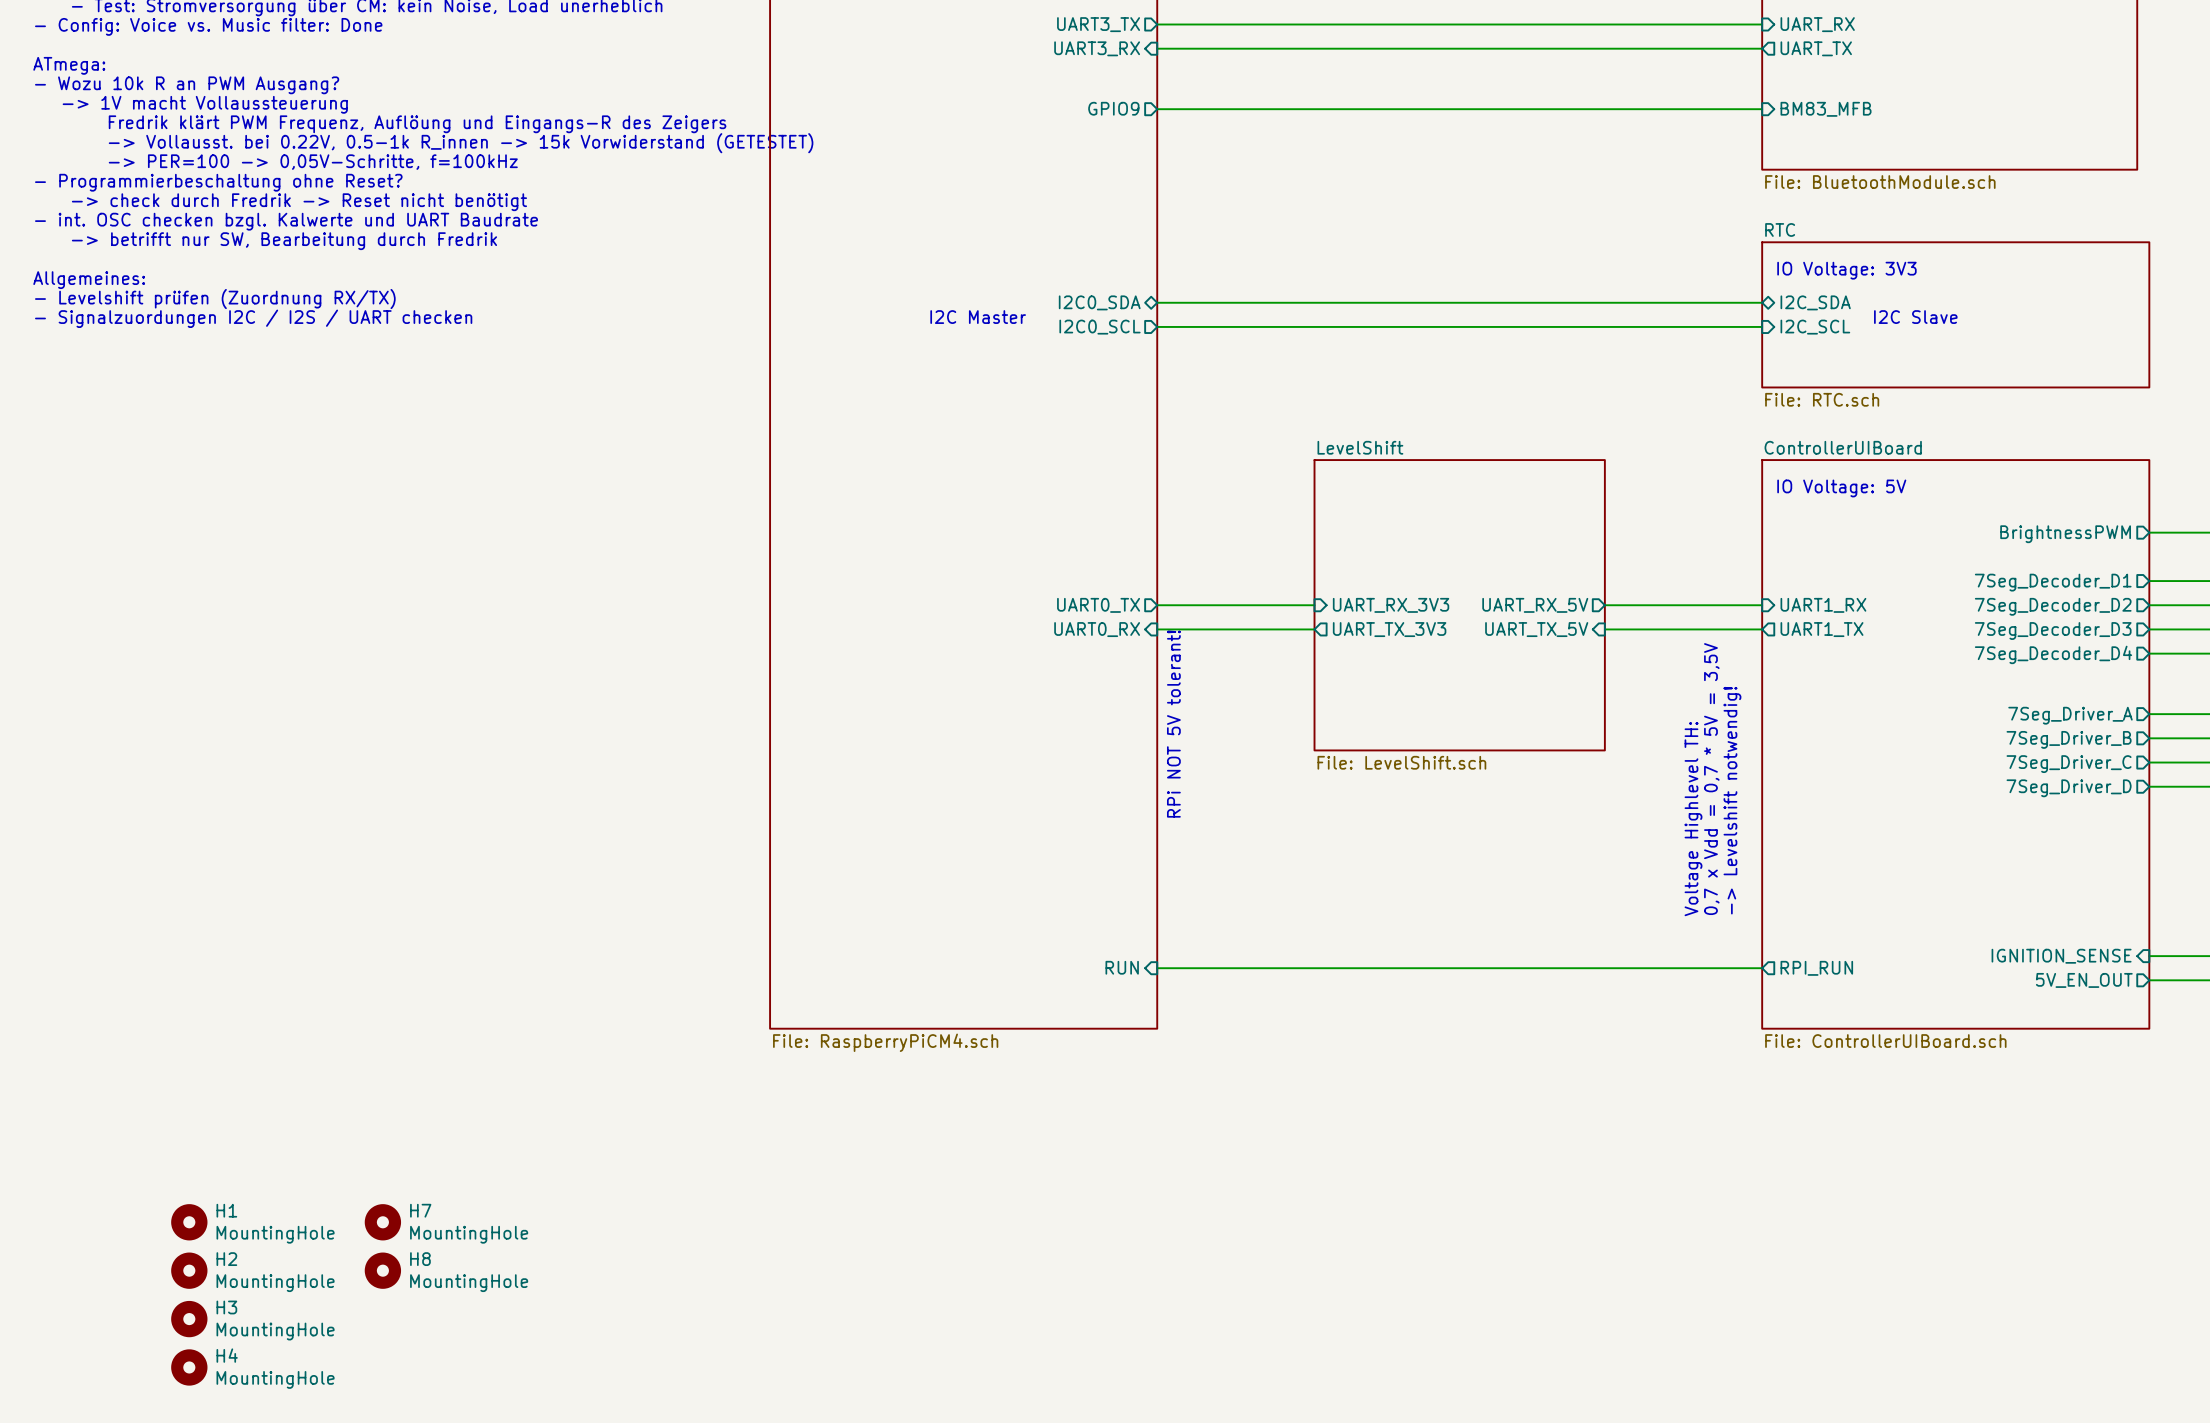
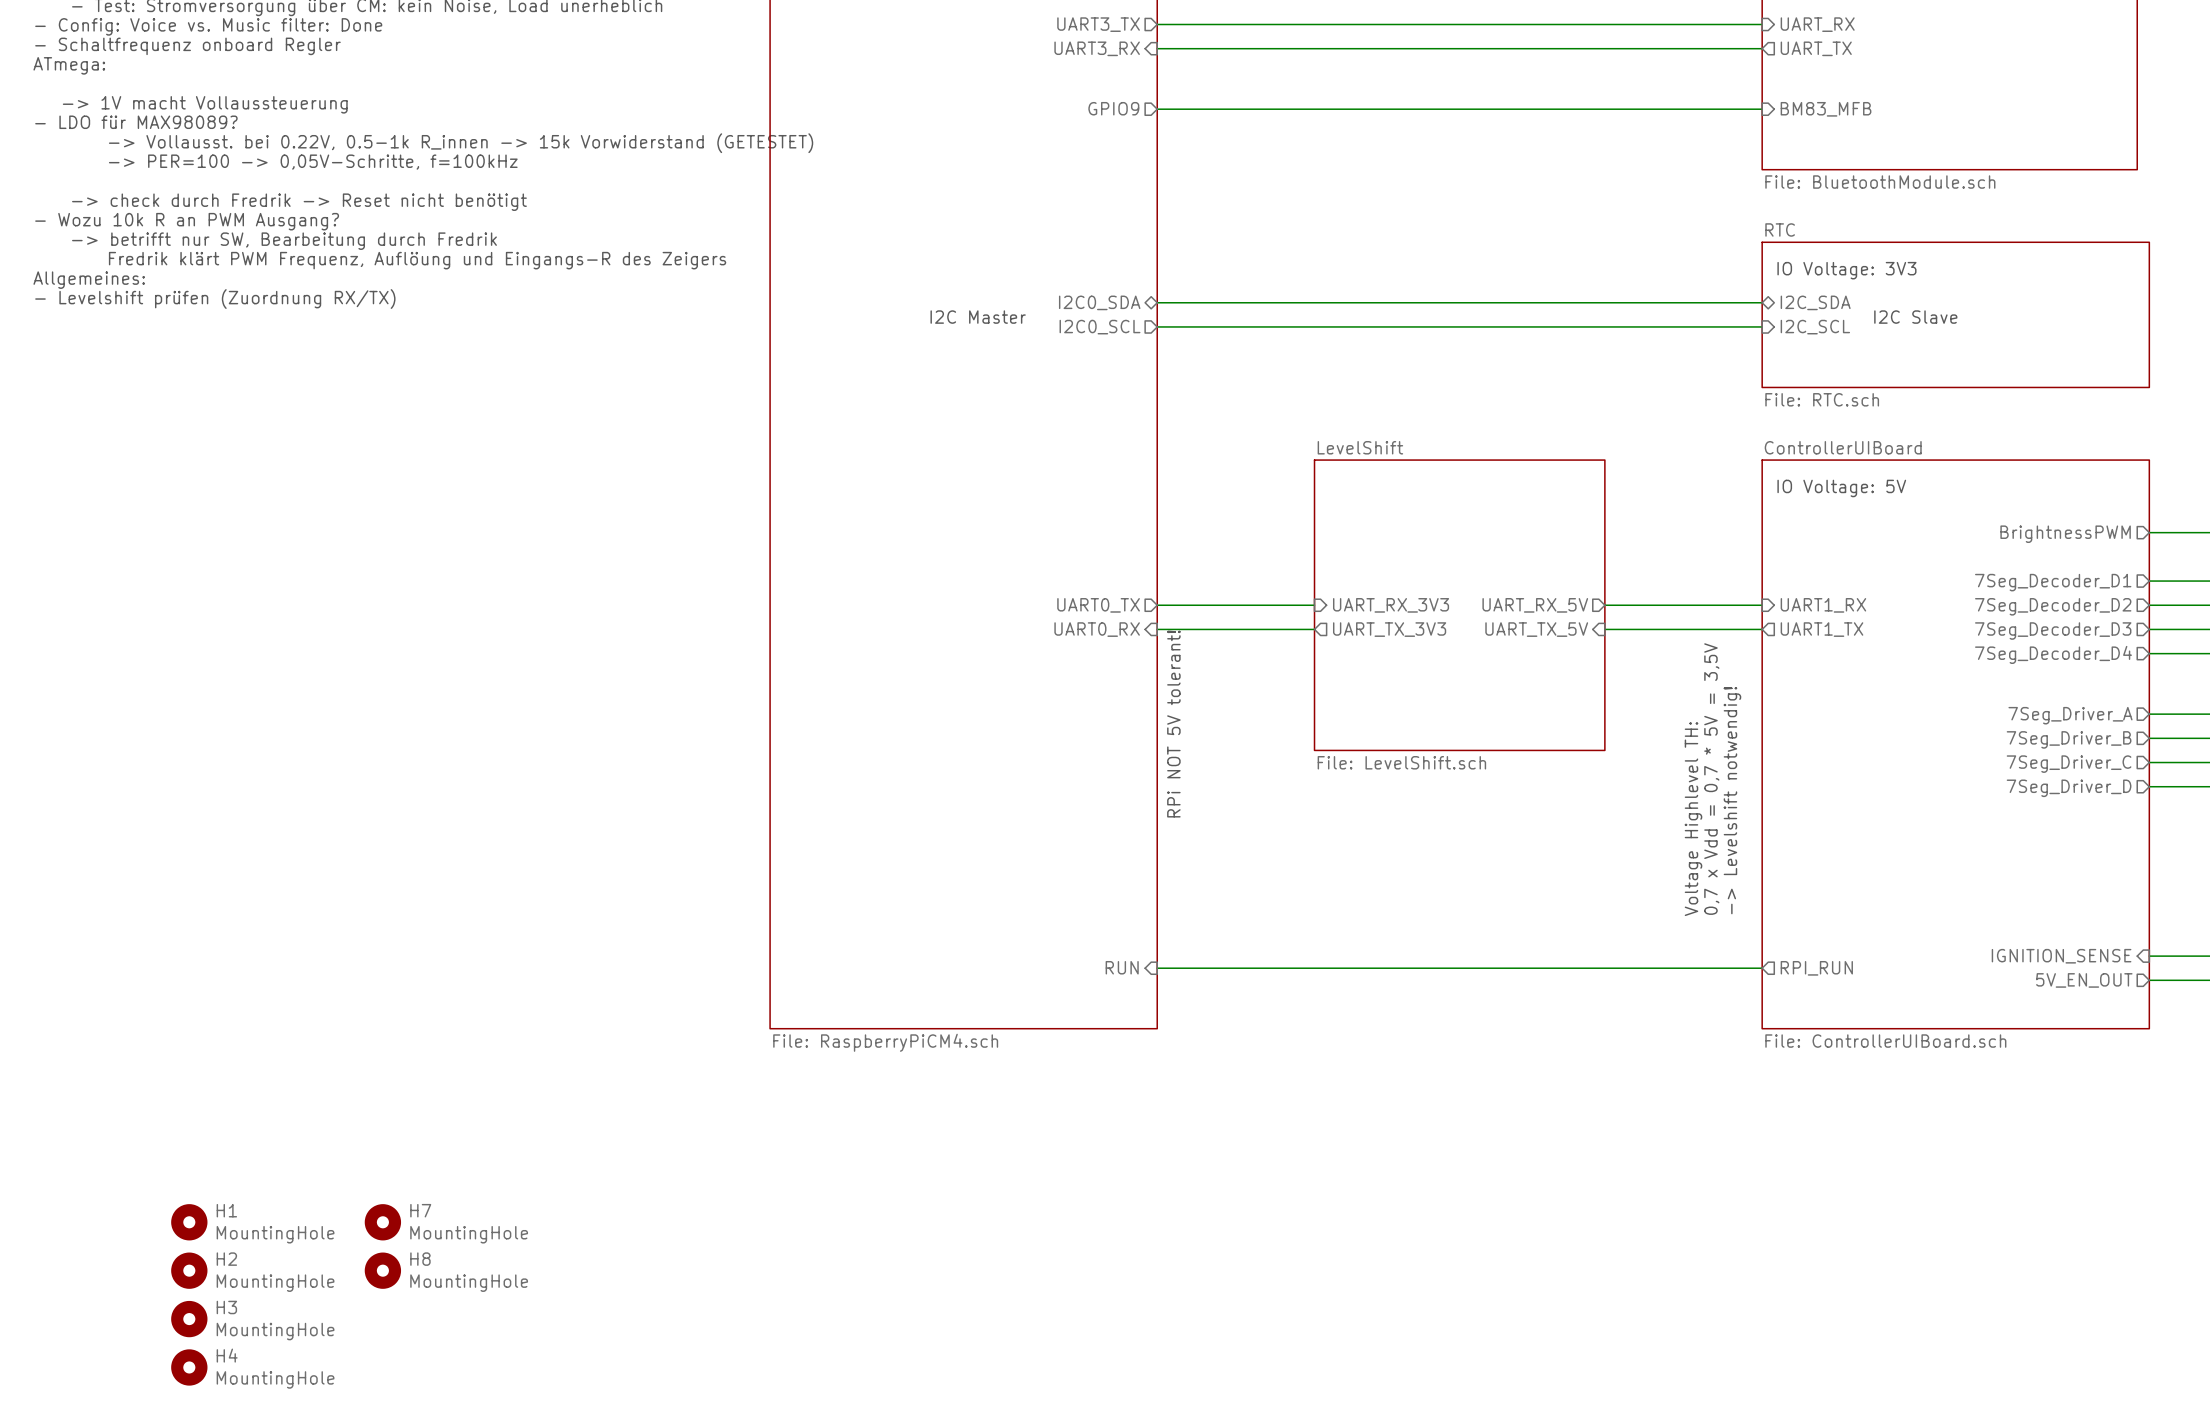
text: none -> - Schaltfrequenz onboard Regler (187, 46)
text: - Wozu 10k R an PWM Ausgang? (187, 85) -> none
text: Fredrik klärt PWM Frequenz, Auflöung und Eingangs-R des Zeigers (417, 124) -> - LDO für MAX98089? (136, 122)
text: - Programmierbeschaltung ohne Reset? (218, 182) -> none
text: - int. OSC checken bzgl. Kalwerte und UART Baudrate (286, 221) -> - Wozu 10k R an PWM Ausgang? (187, 221)
text: none -> Fredrik klärt PWM Frequenz, Auflöung und Eingangs-R des Zeigers (417, 260)
text: - Signalzuordungen I2C / I2S / UART checken (253, 318) -> none

